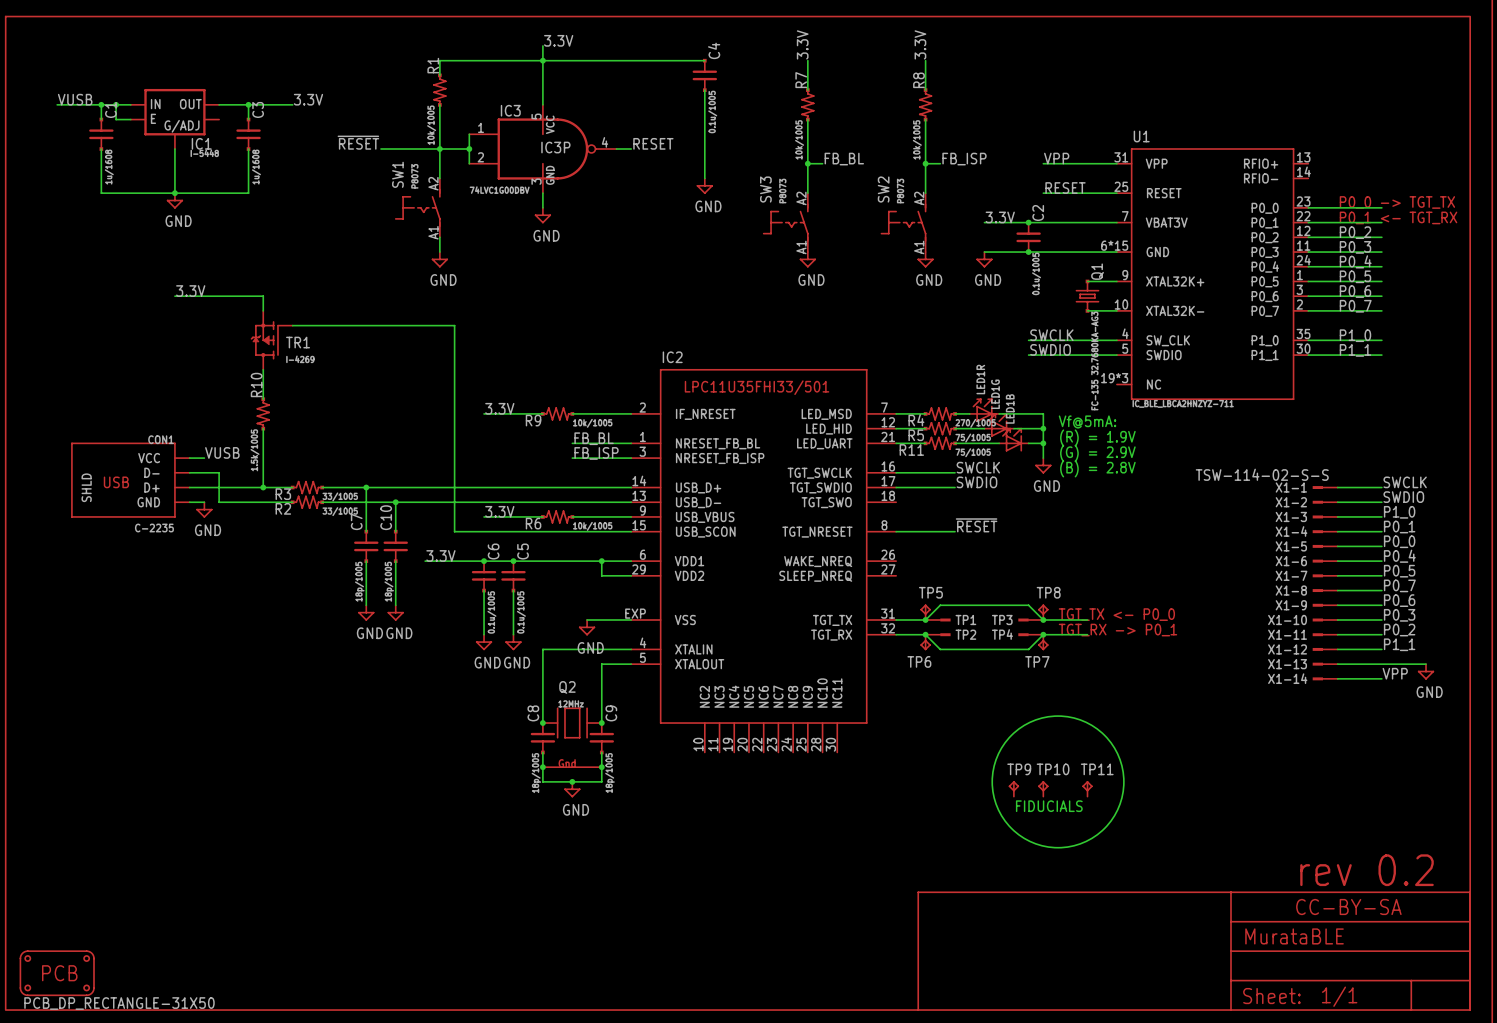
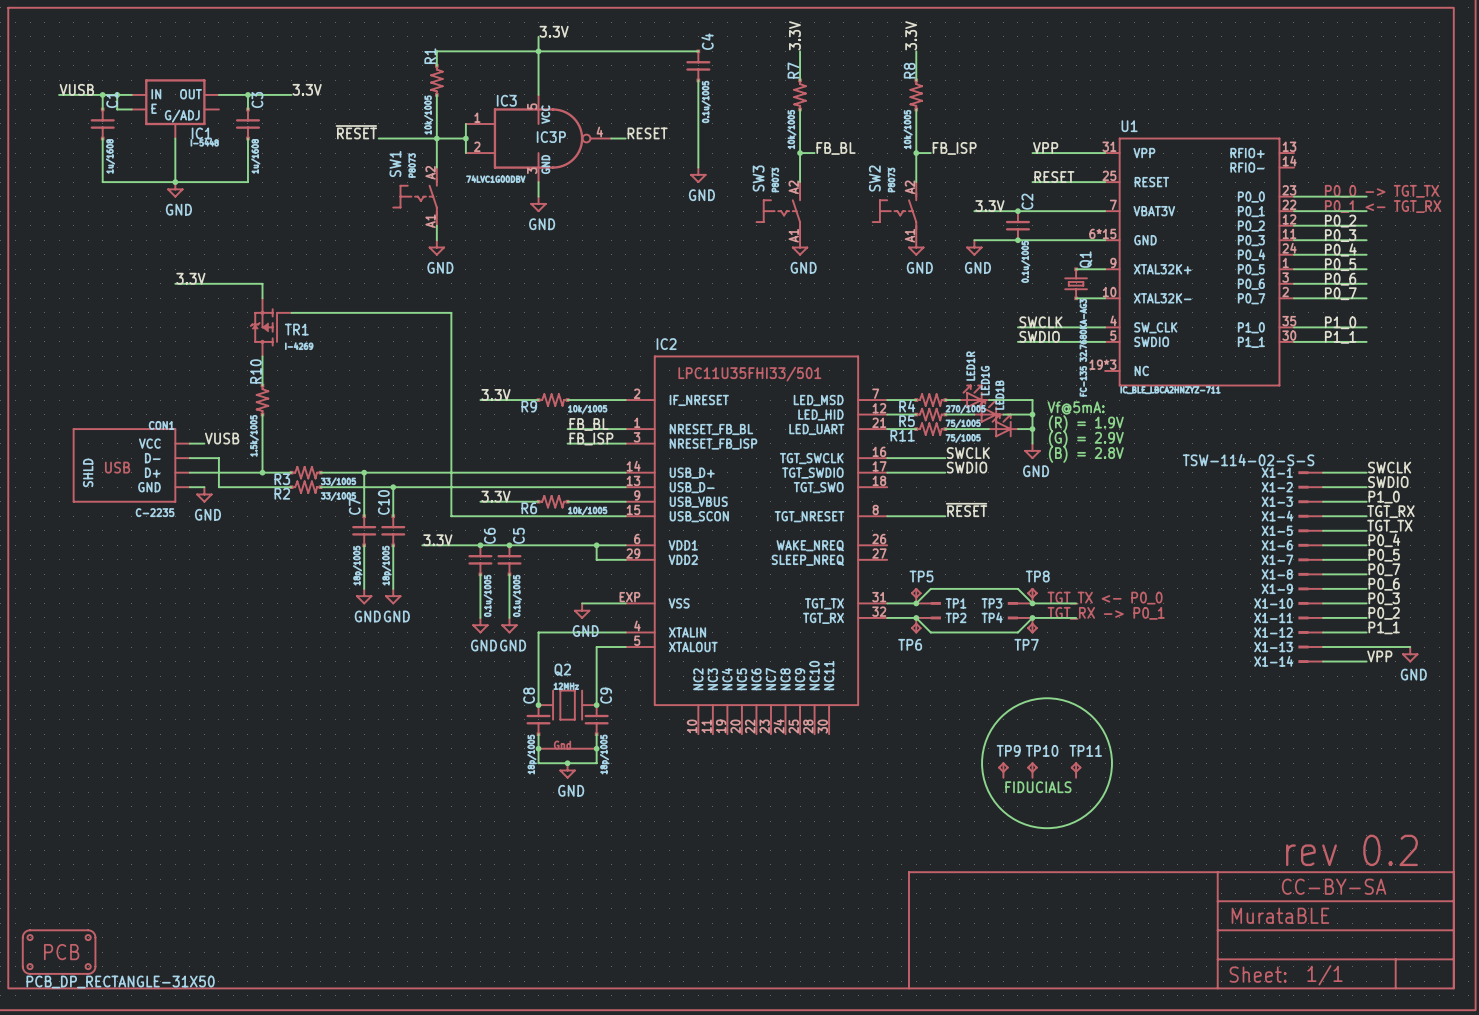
label: P0_1 (1399, 527) -> TGT_RX (1390, 511)
label: P0_0 (1399, 541) -> TGT_TX (1389, 526)

